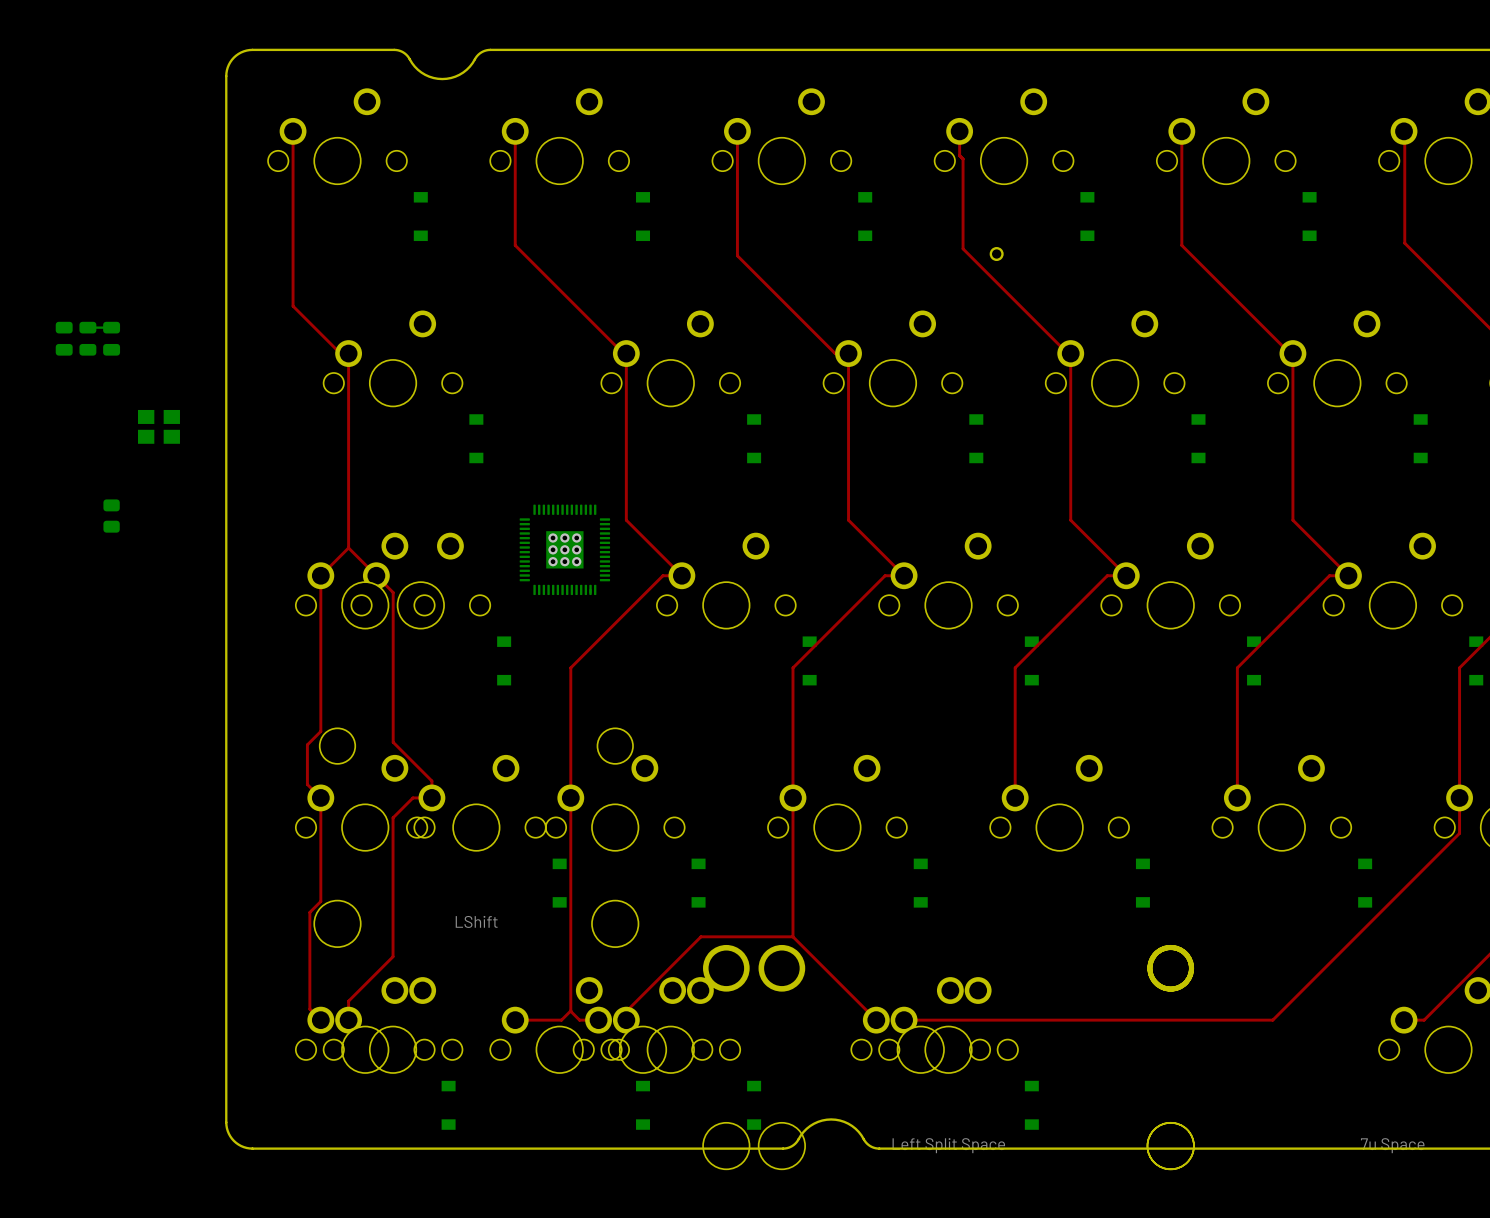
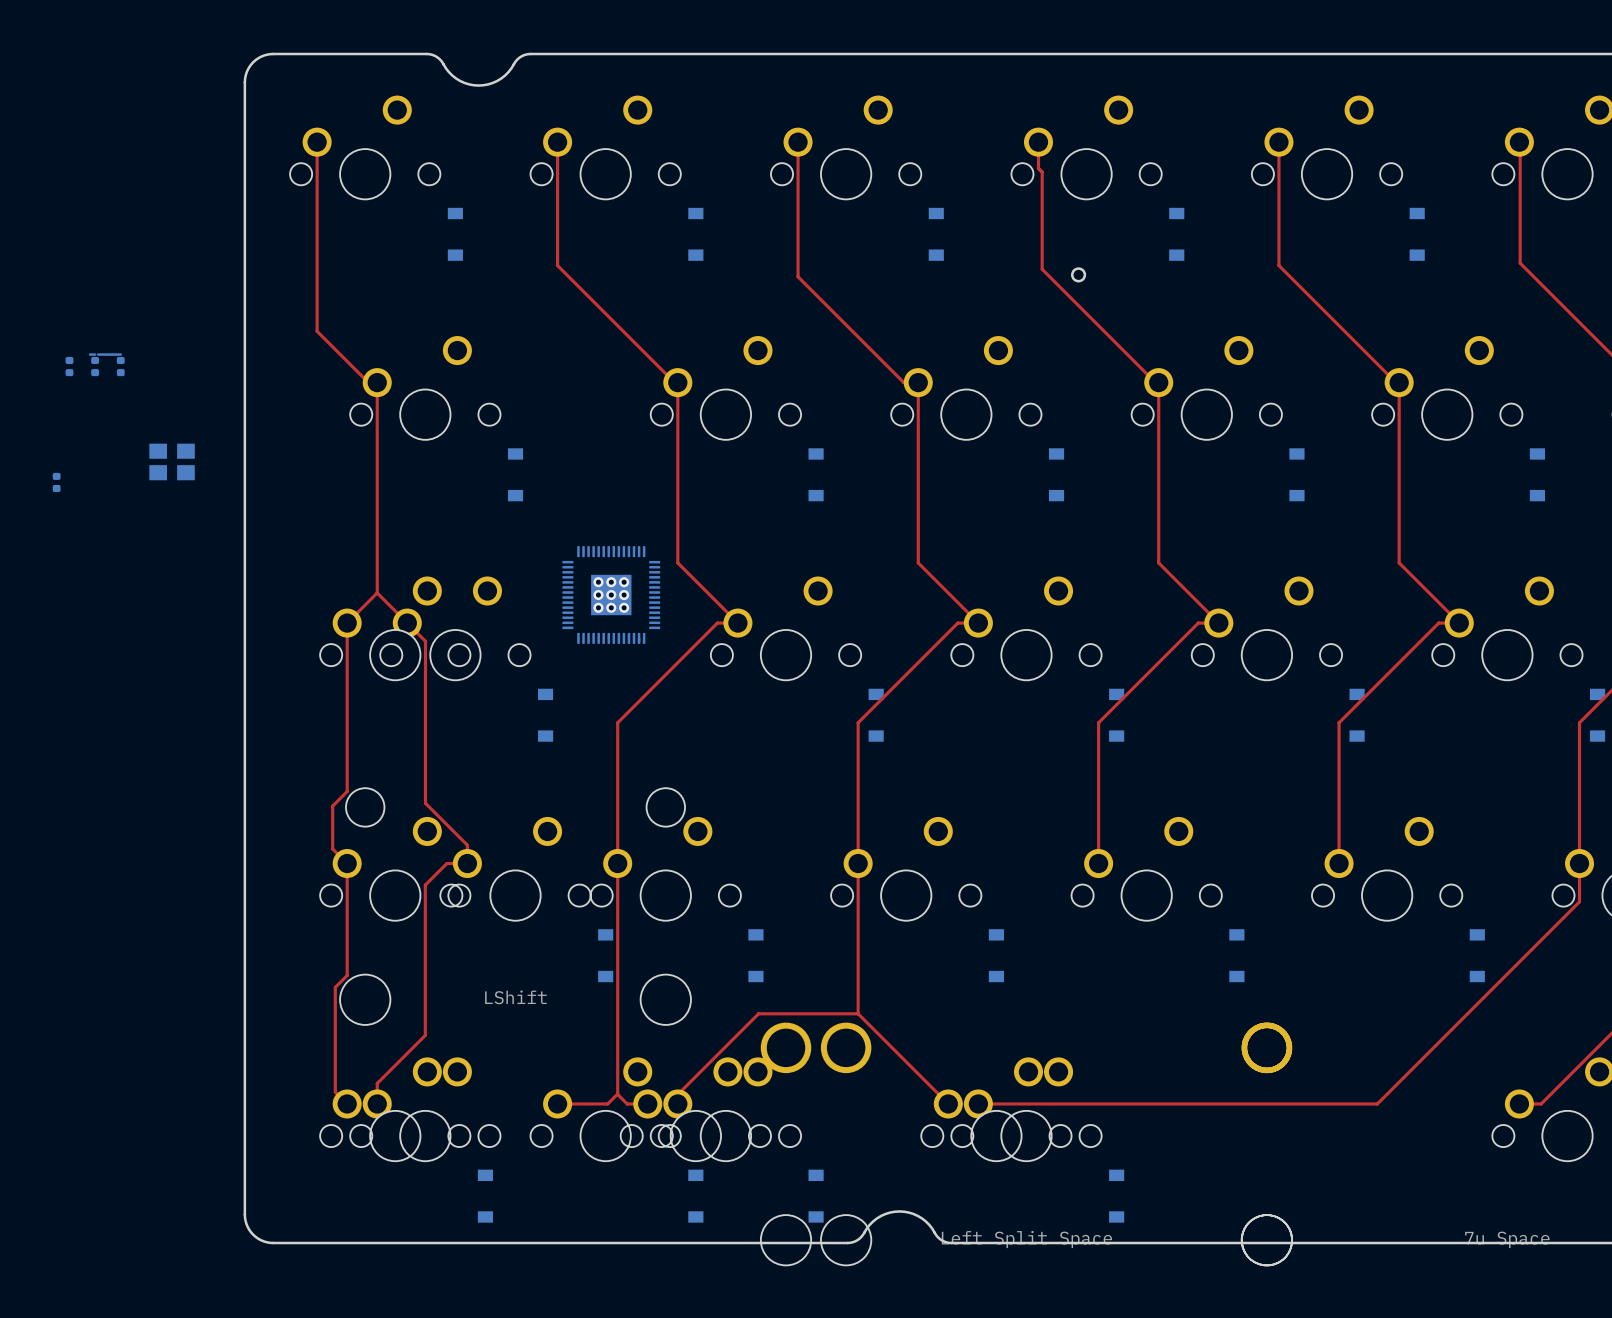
part footprint: [55, 321, 73, 356] -> [65, 356, 74, 377]
part footprint: [79, 321, 97, 356] -> [91, 356, 100, 377]
part footprint: [103, 321, 121, 356] -> [116, 356, 125, 377]
part: none -> (56, 482)
part: (111, 516) -> none

